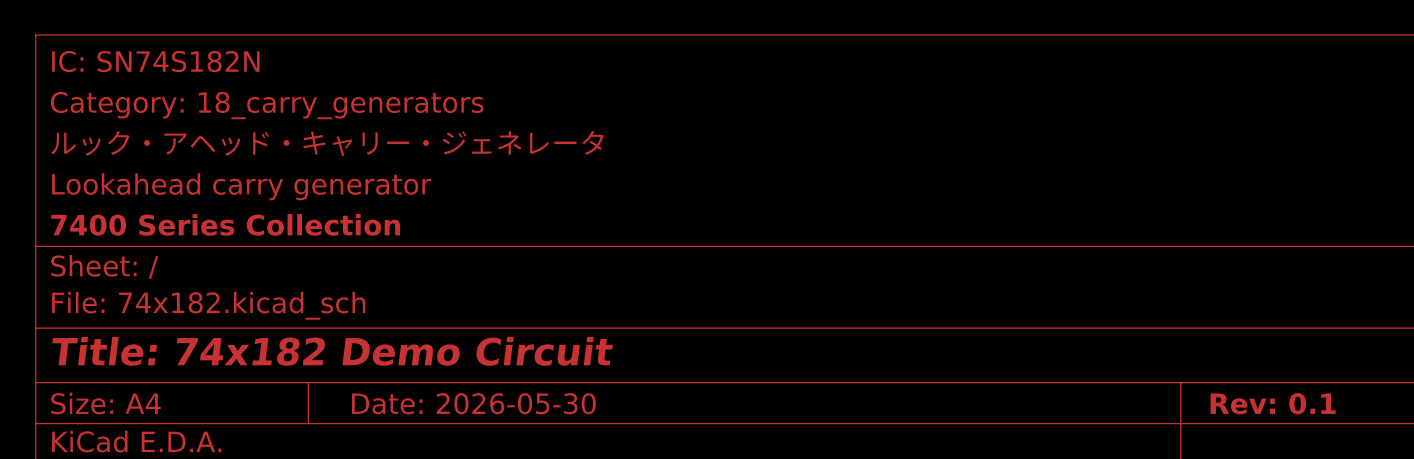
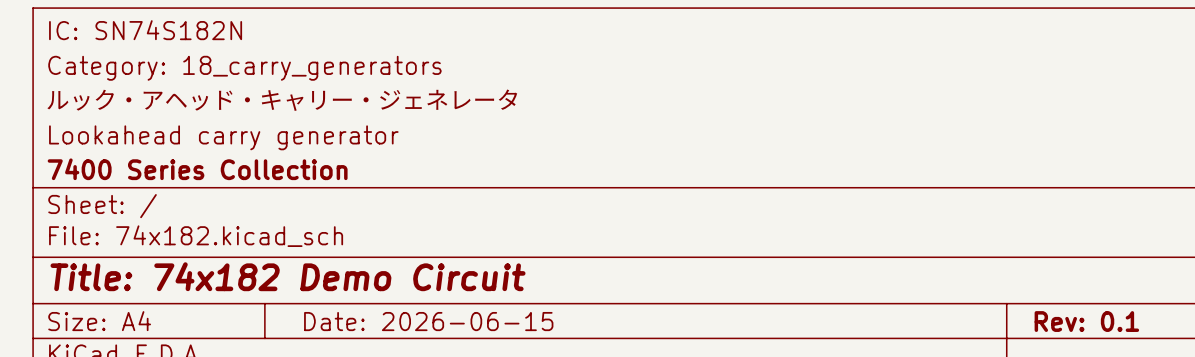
title block: Date: 2026-05-30 (473, 403) -> Date: 2026-06-15 (428, 321)

